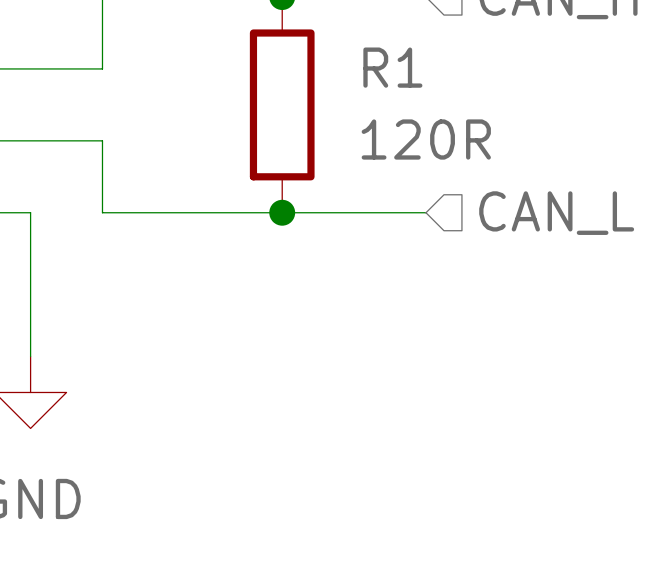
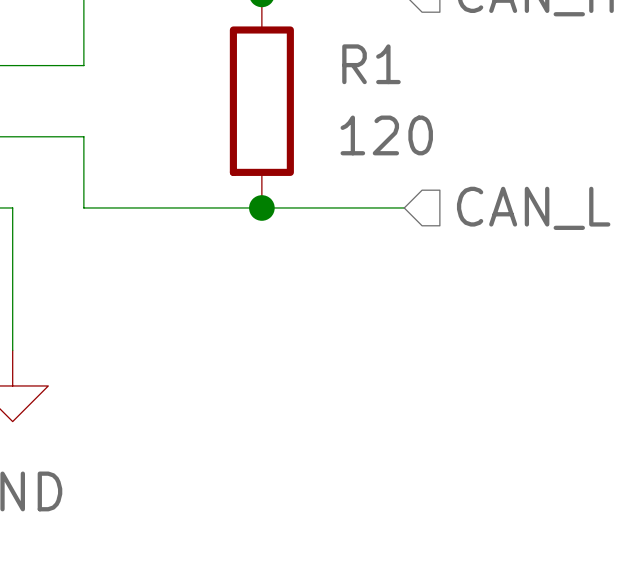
R1 value: 120R (426, 139) -> 120 (386, 135)

